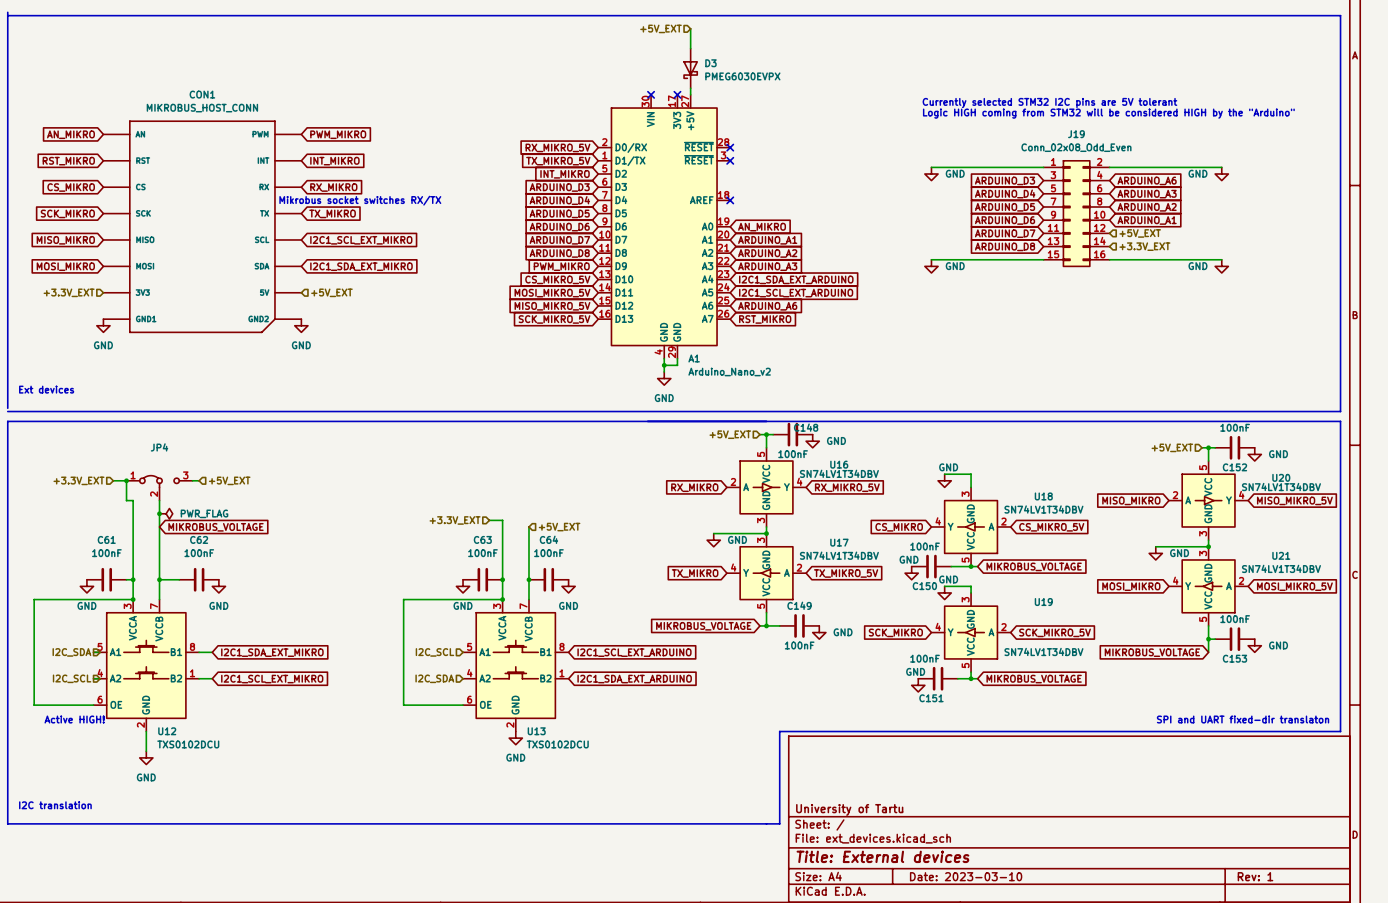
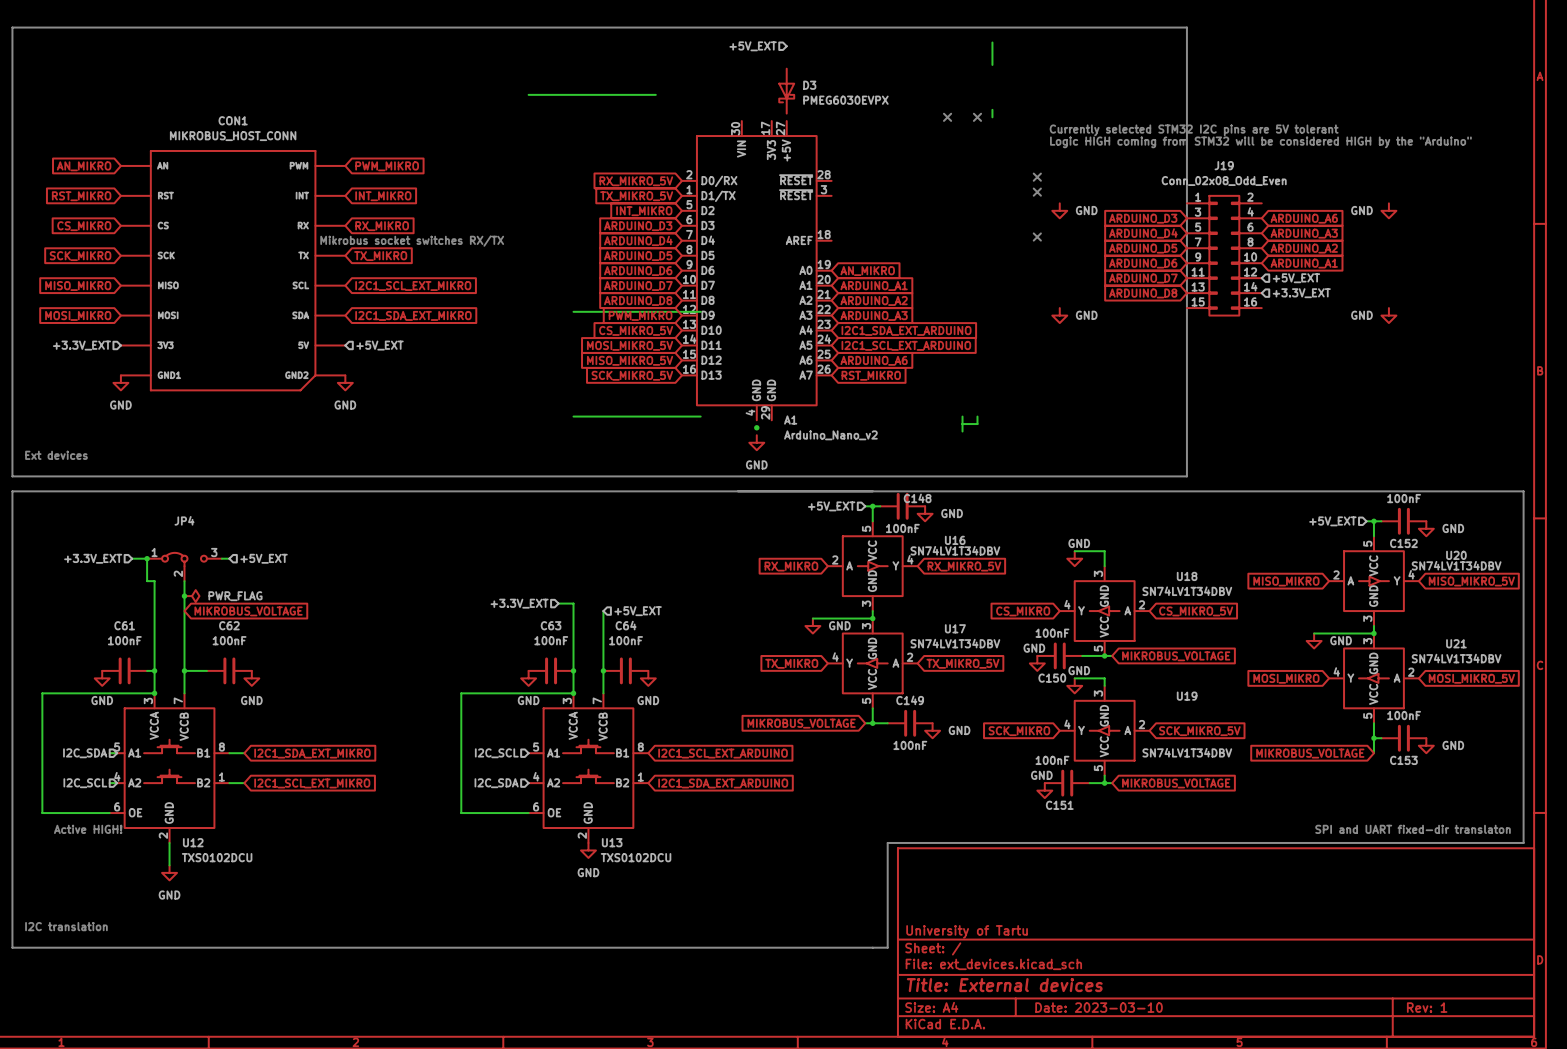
line: none -> (12, 27) (1186, 27) (1186, 476) (12, 476)
line: (7, 15) (1340, 15) (1340, 411) (7, 411) -> none
wire: none -> (992, 42) (992, 64)
wire: (690, 28) (690, 48) -> none
wire: none -> (528, 94) (655, 94)
wire: none -> (992, 109) (992, 117)
wire: (690, 88) (690, 94) -> none
no-connect mark: none -> (947, 117)
no-connect mark: none -> (977, 117)
no-connect mark: (651, 94) -> none
no-connect mark: (677, 94) -> none
no-connect mark: none -> (1037, 177)
no-connect mark: (730, 147) -> none
no-connect mark: none -> (1037, 192)
no-connect mark: (730, 160) -> none
wire: (931, 167) (1043, 167) -> none
wire: (1109, 167) (1221, 167) -> none
no-connect mark: none -> (1037, 237)
no-connect mark: (730, 200) -> none
wire: (931, 259) (1043, 259) -> none
wire: (1109, 259) (1221, 259) -> none
wire: none -> (573, 311) (700, 311)
wire: none -> (573, 416) (700, 416)
wire: none -> (962, 416) (962, 431)
wire: none -> (977, 416) (977, 424) (962, 424)
wire: (664, 358) (664, 371) -> none
wire: (677, 358) (677, 365) (664, 365) -> none

